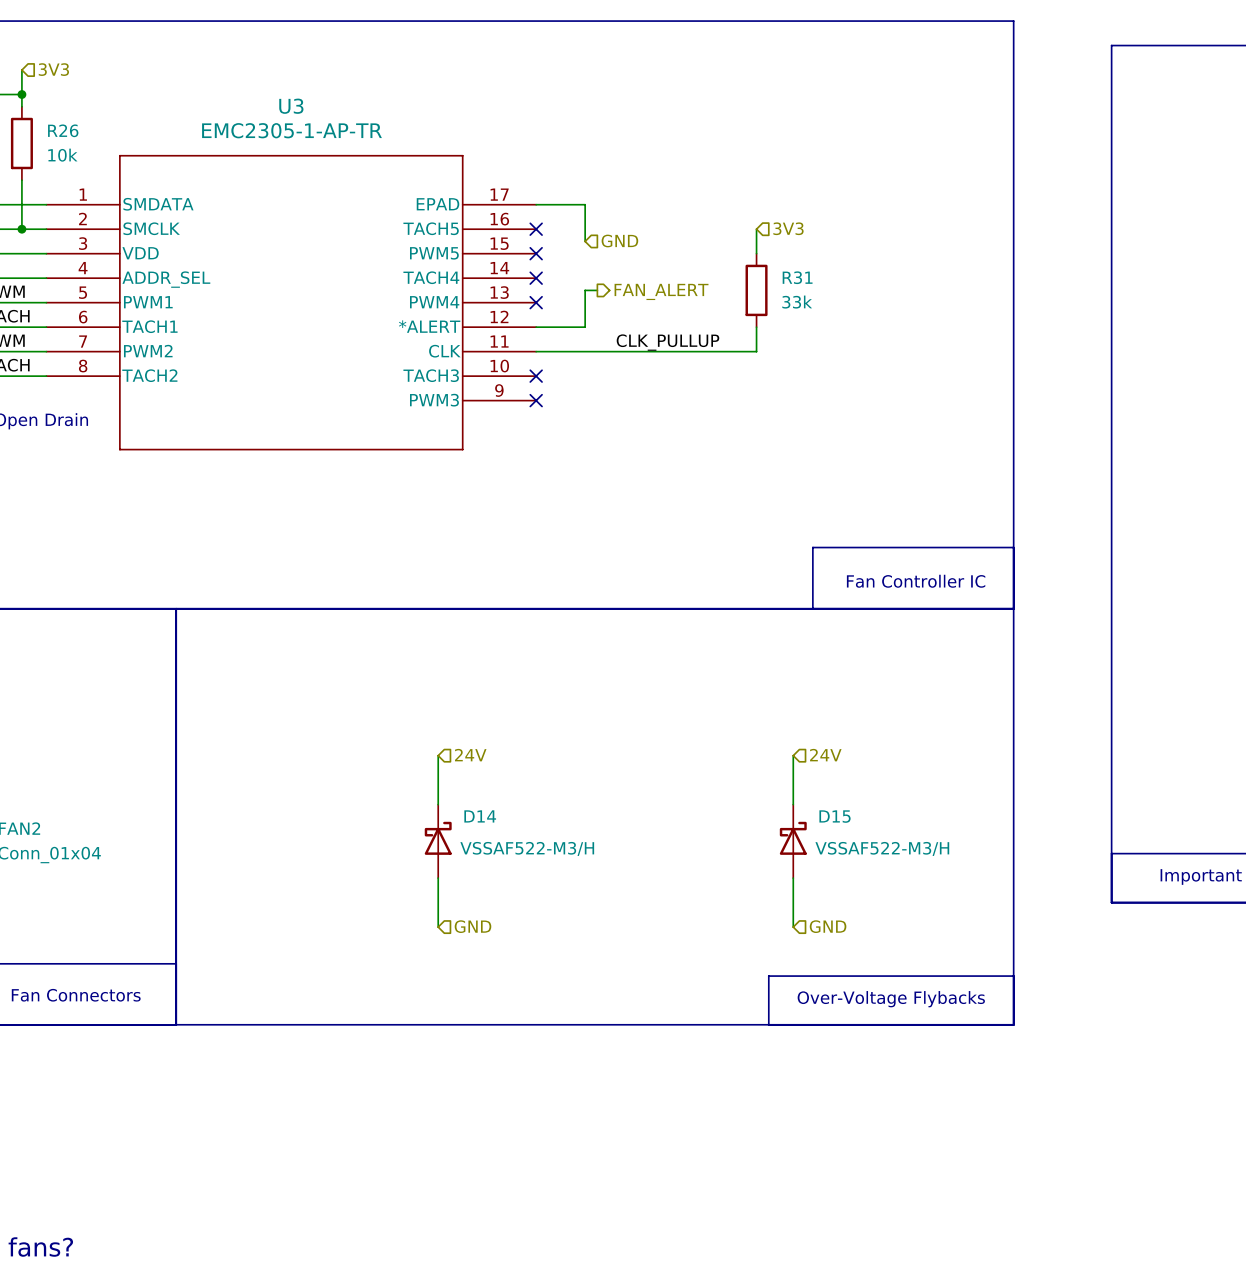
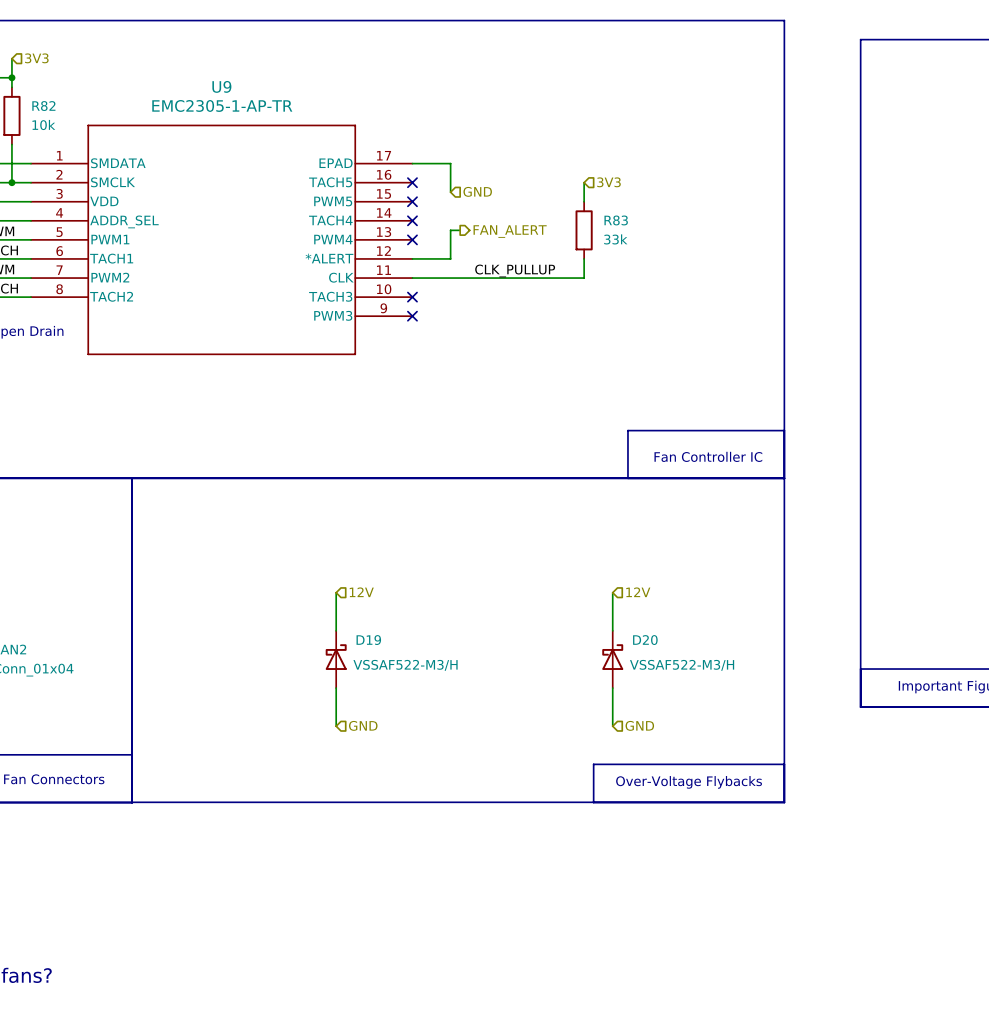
U3 name: U3 (291, 106) -> U9 (221, 86)
R26 name: R26 (63, 130) -> R82 (43, 106)
R31 name: R31 (797, 277) -> R83 (616, 220)
hierarchical label: 24V (470, 755) -> 12V (361, 592)
hierarchical label: 24V (825, 755) -> 12V (638, 592)
D14 name: D14 (480, 816) -> D19 (368, 640)
D15 name: D15 (835, 816) -> D20 (645, 640)

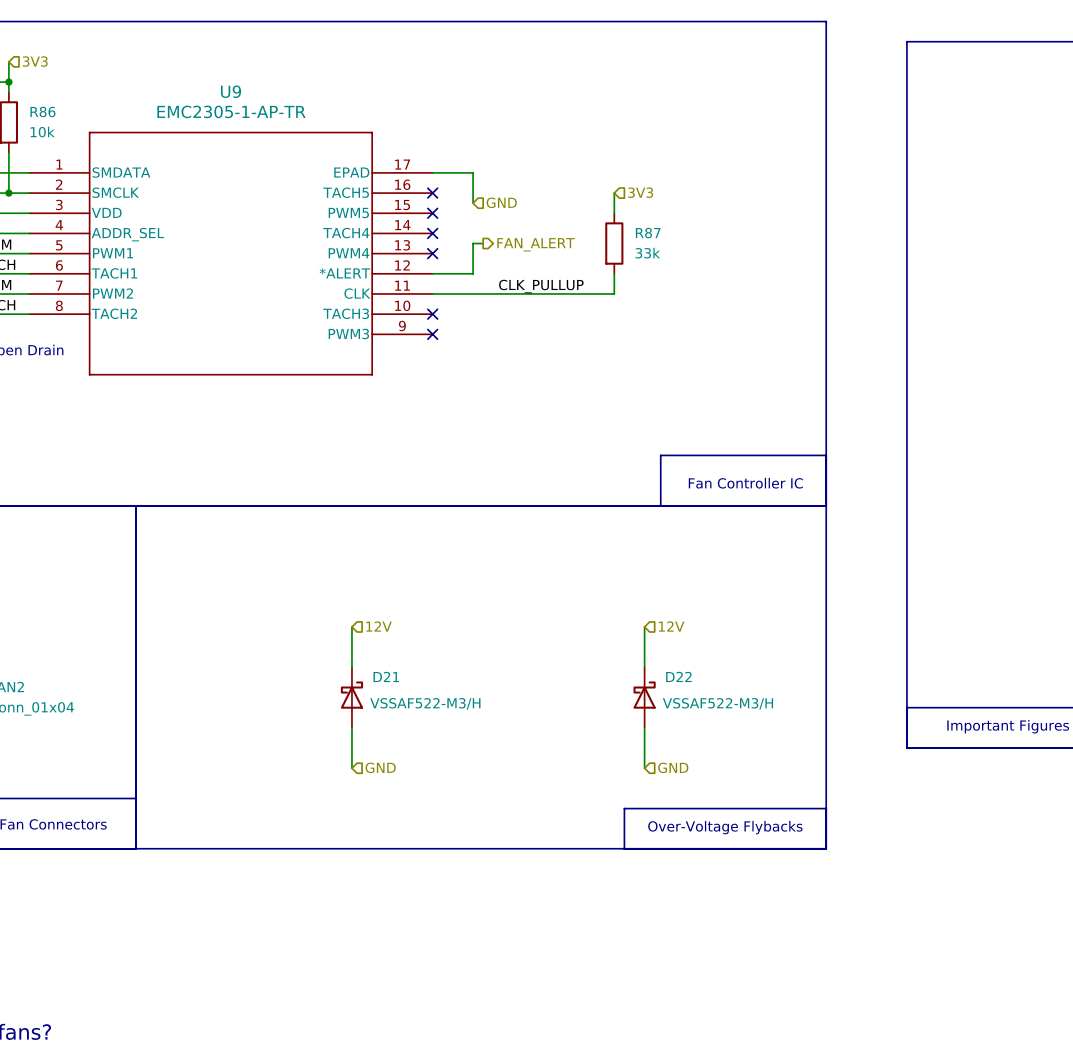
R82 name: R82 (43, 106) -> R86 (42, 111)
R83 name: R83 (616, 220) -> R87 (648, 233)
D19 name: D19 (368, 640) -> D21 (386, 676)
D20 name: D20 (645, 640) -> D22 (678, 676)

